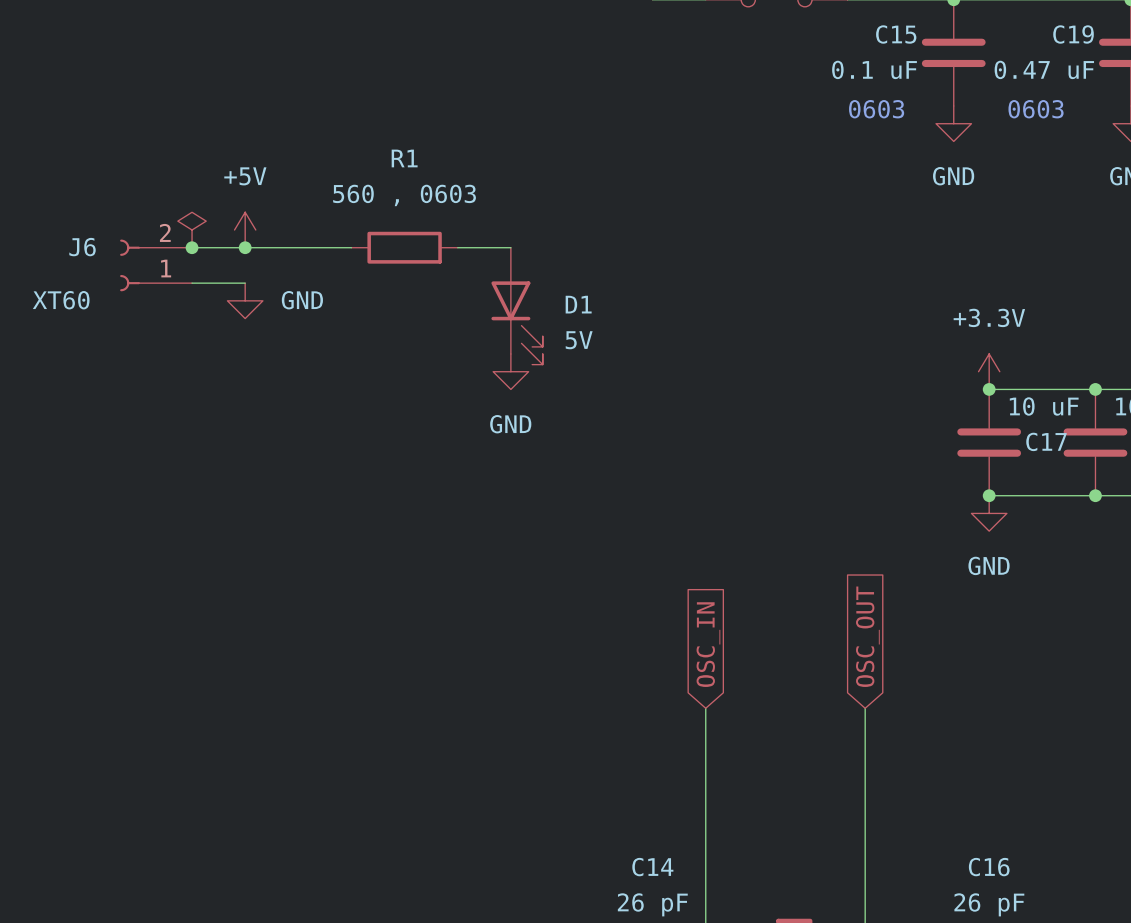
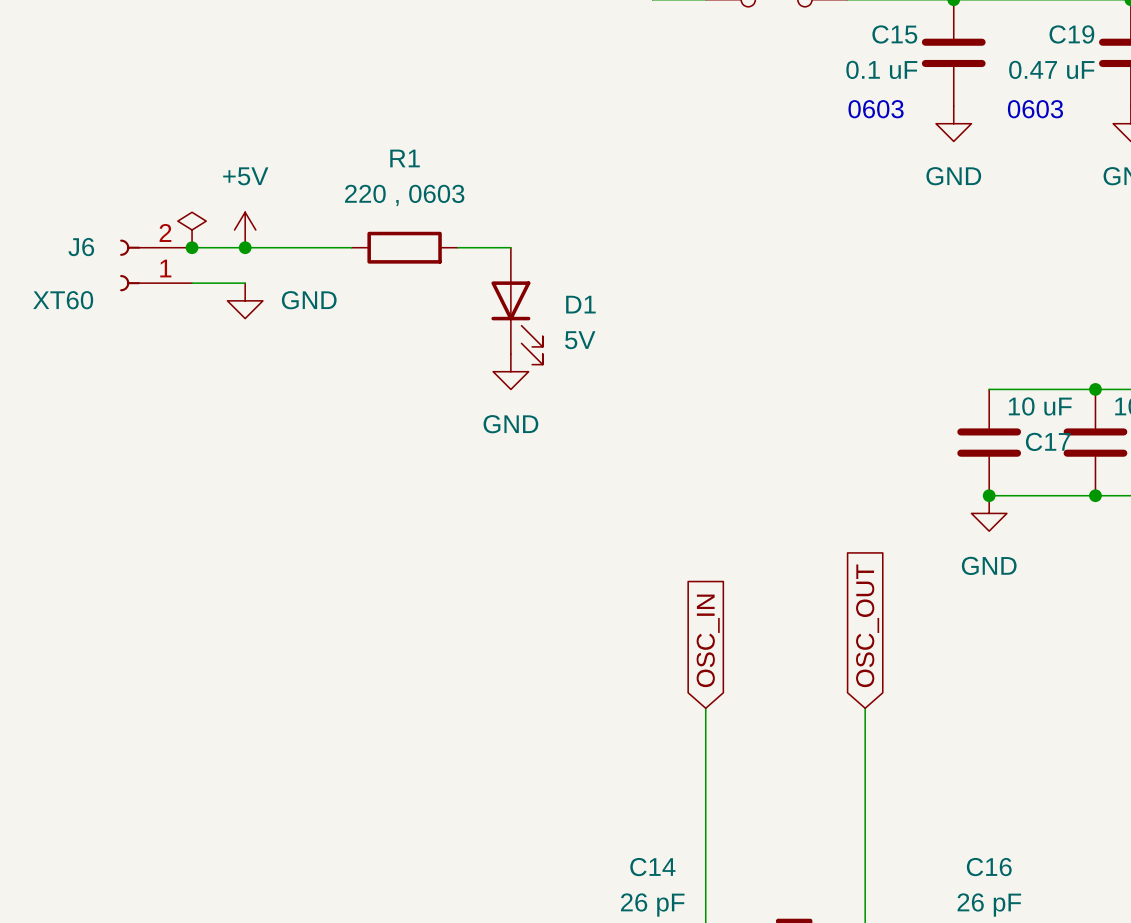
R1 value: 560 , 0603 (404, 195) -> 220 , 0603 (404, 195)
power symbol: +3.3V (989, 371) -> none
junction: (989, 389) -> none

